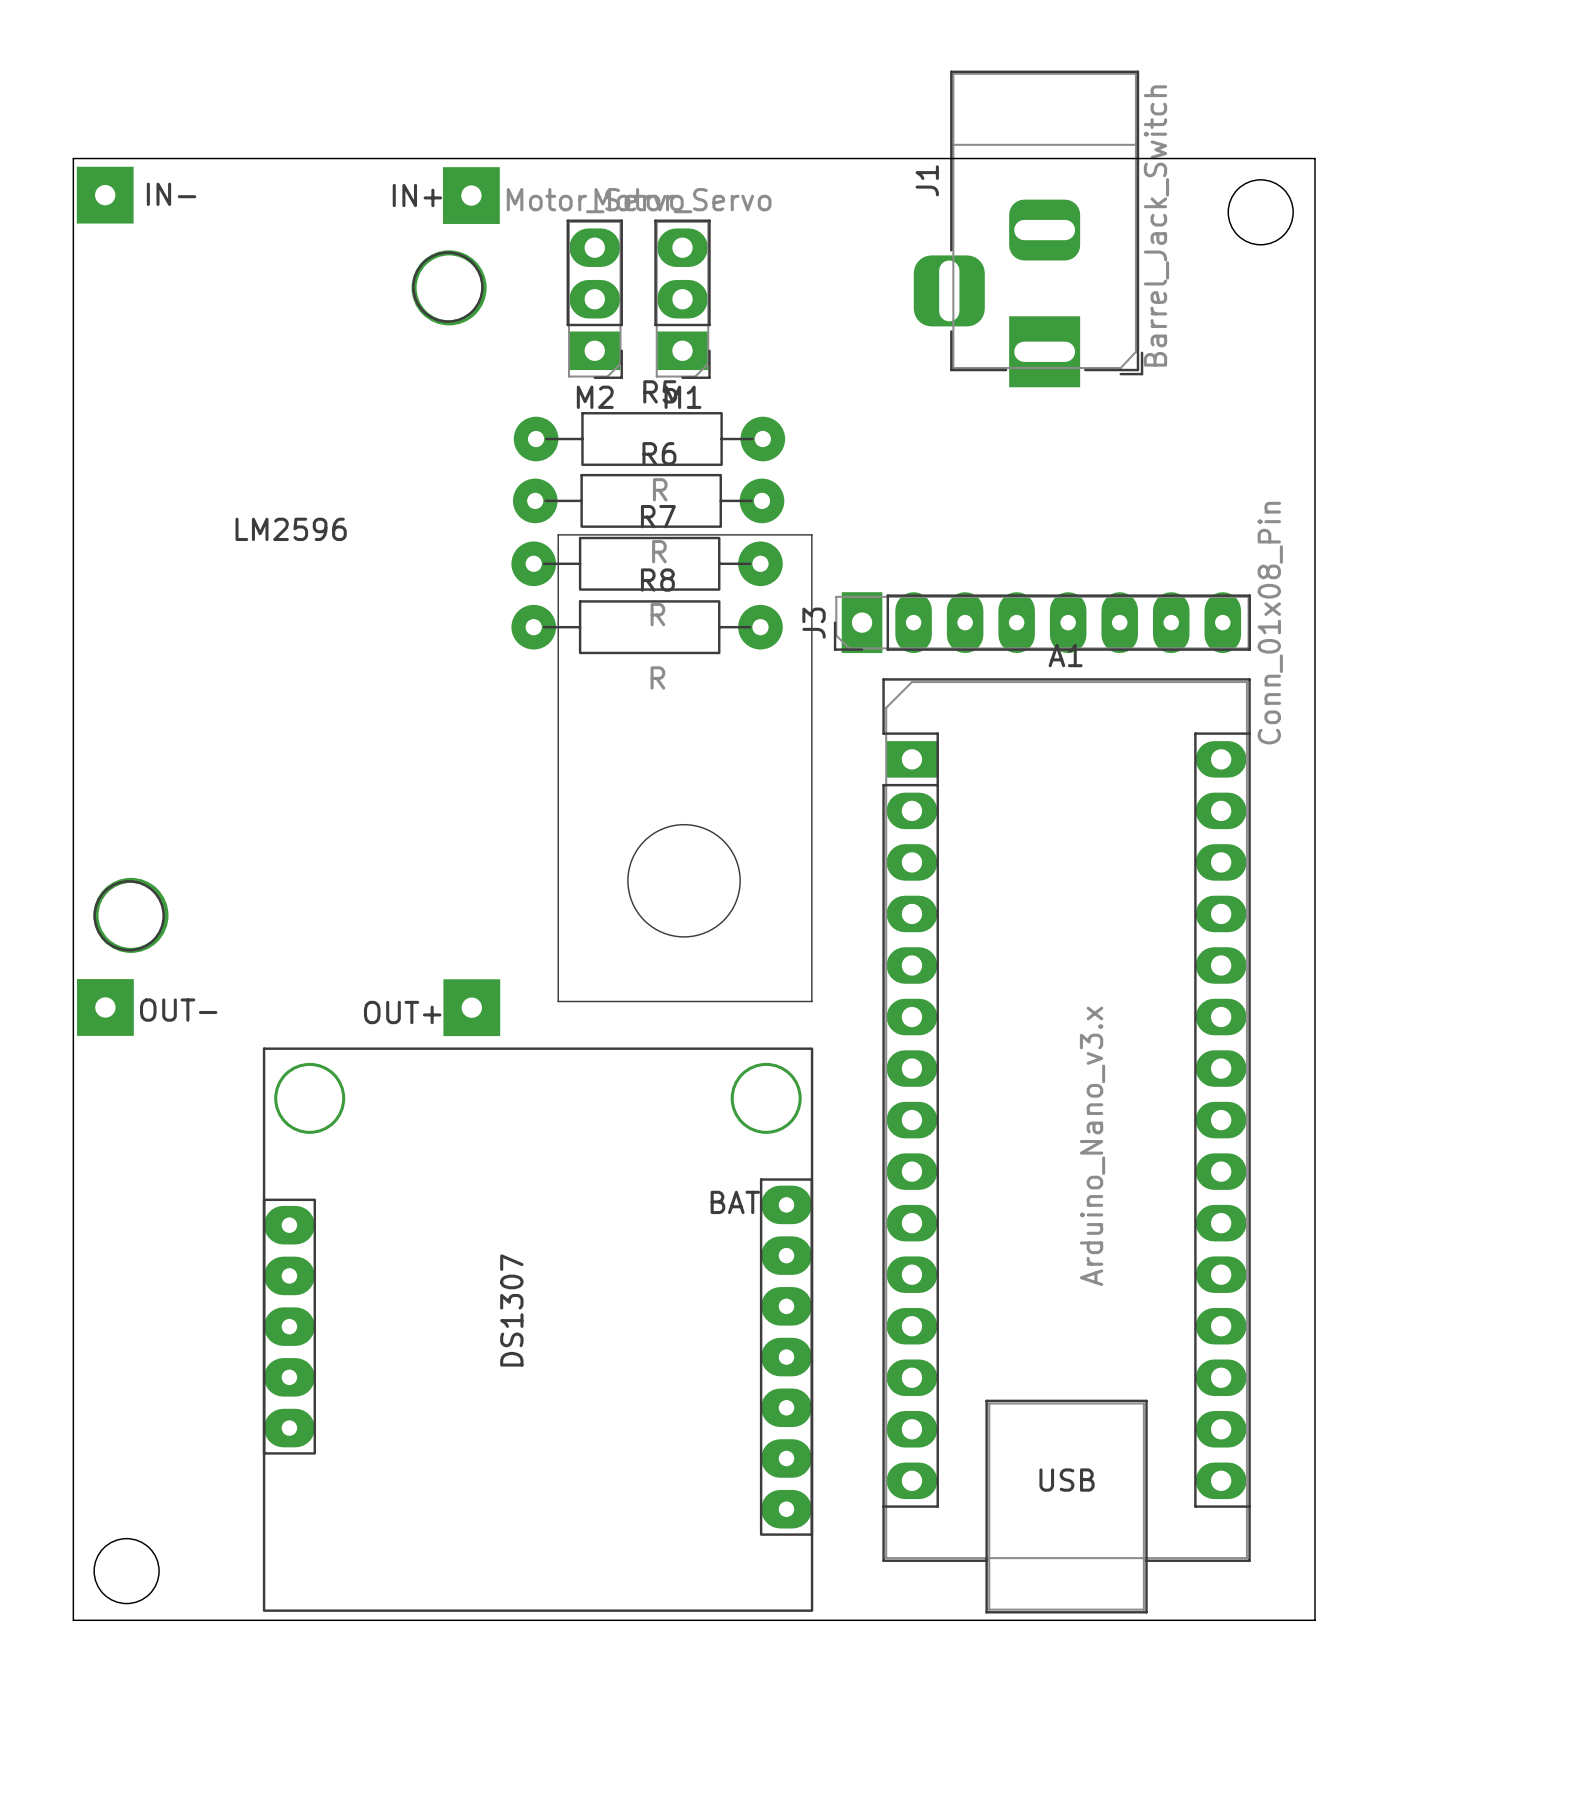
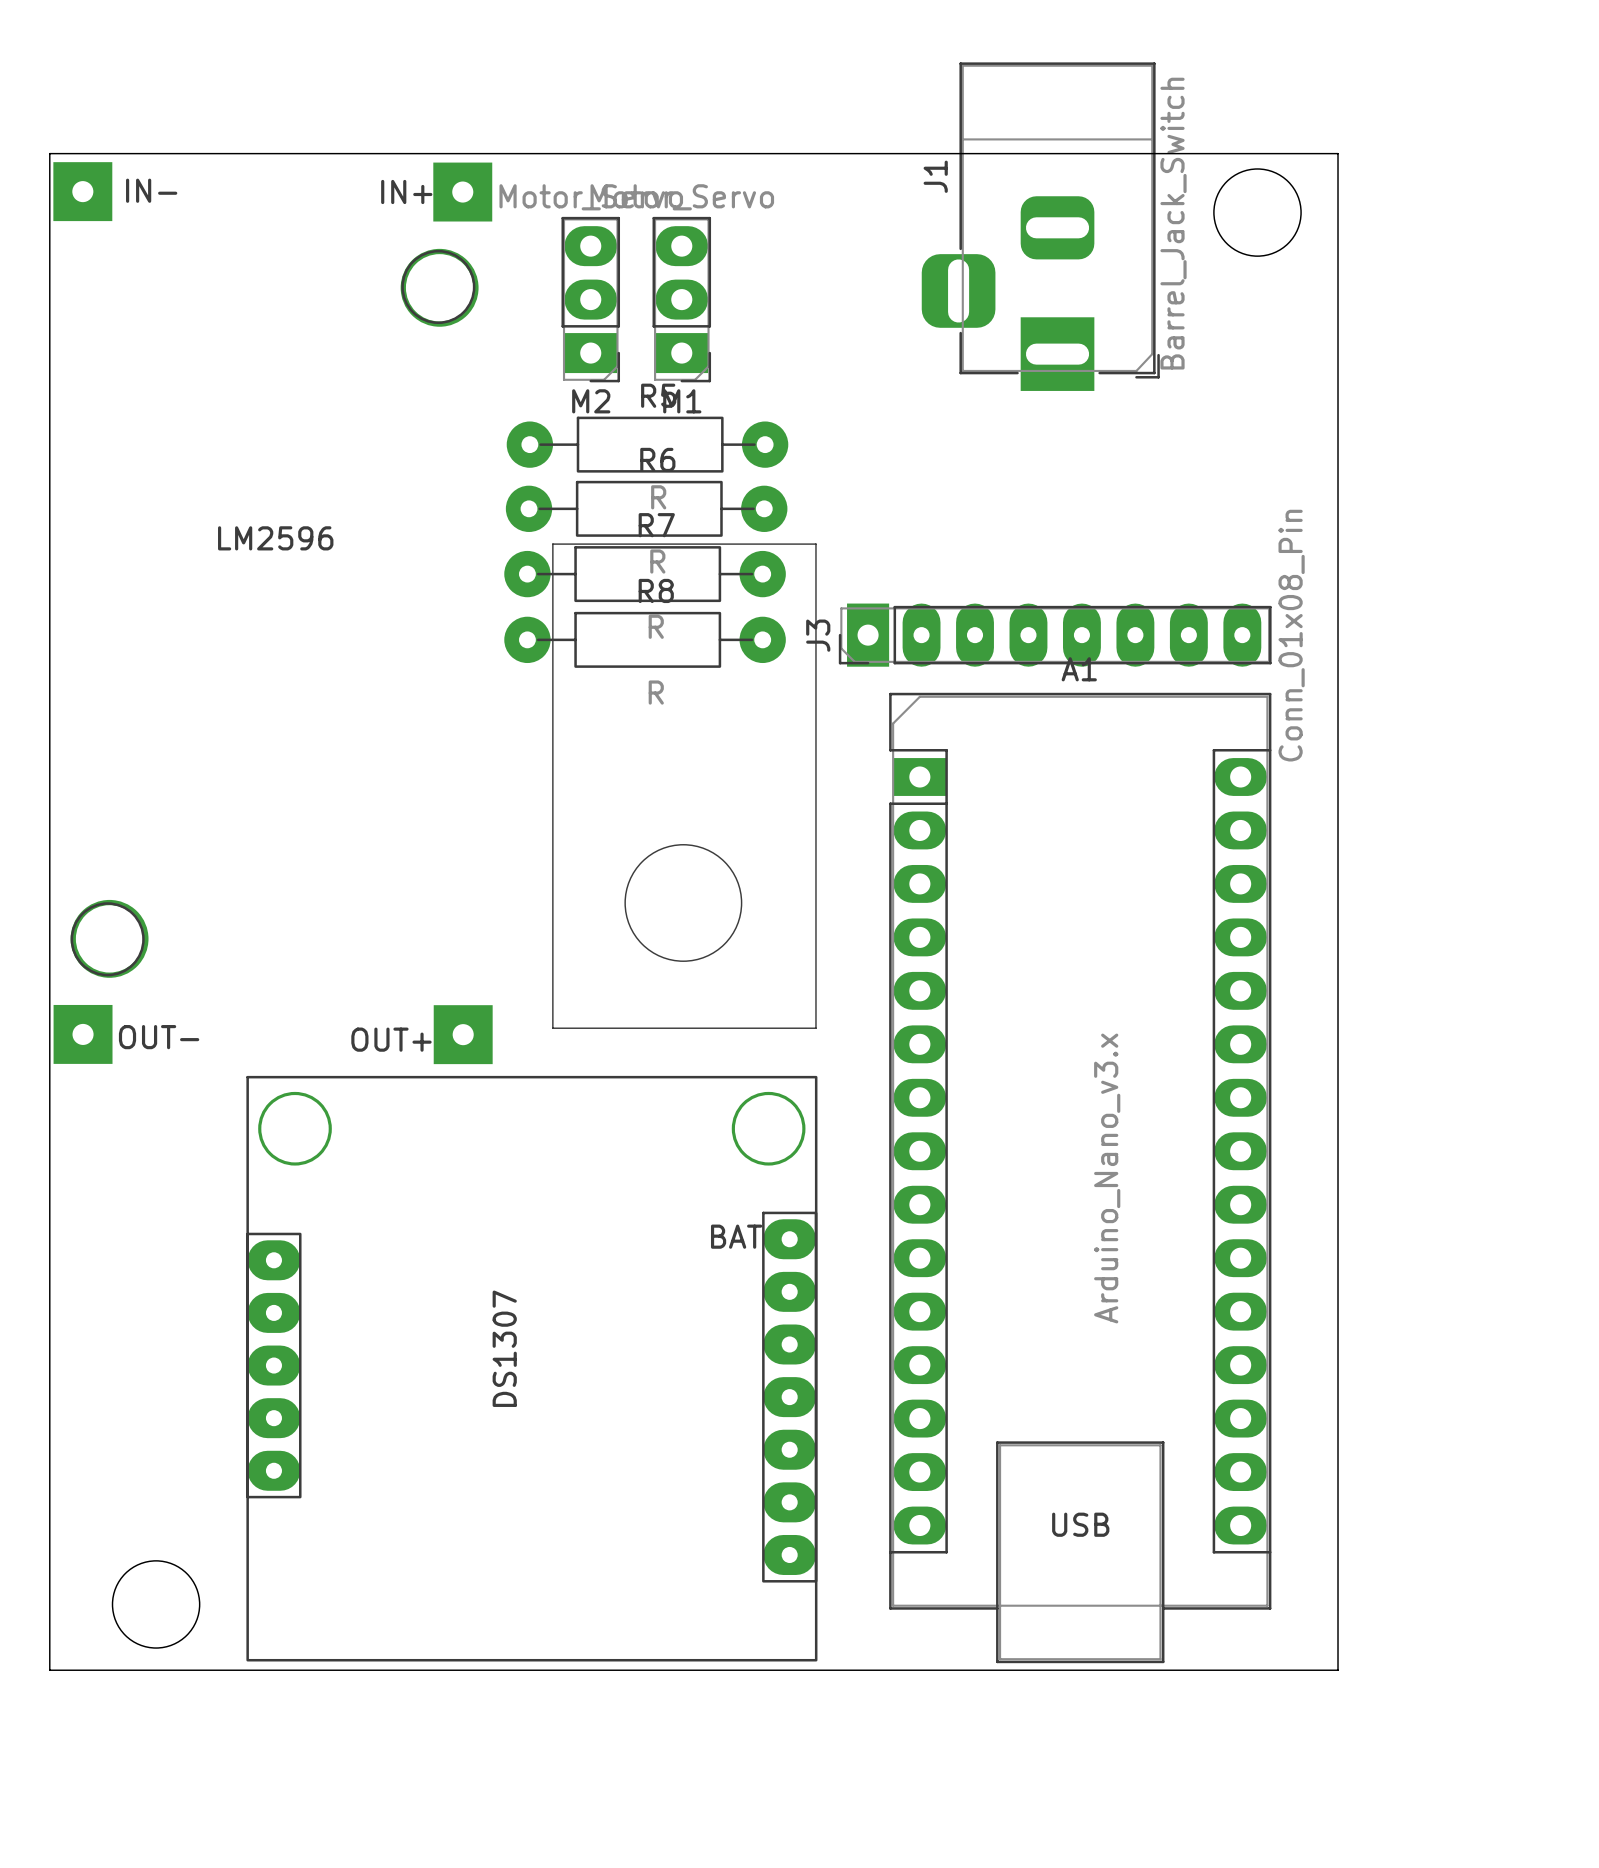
round board edge: none -> [1213, 168, 1302, 257]
round board edge: [1227, 179, 1294, 246] -> none
round board edge: none -> [111, 1560, 201, 1649]
round board edge: [93, 1538, 160, 1605] -> none

